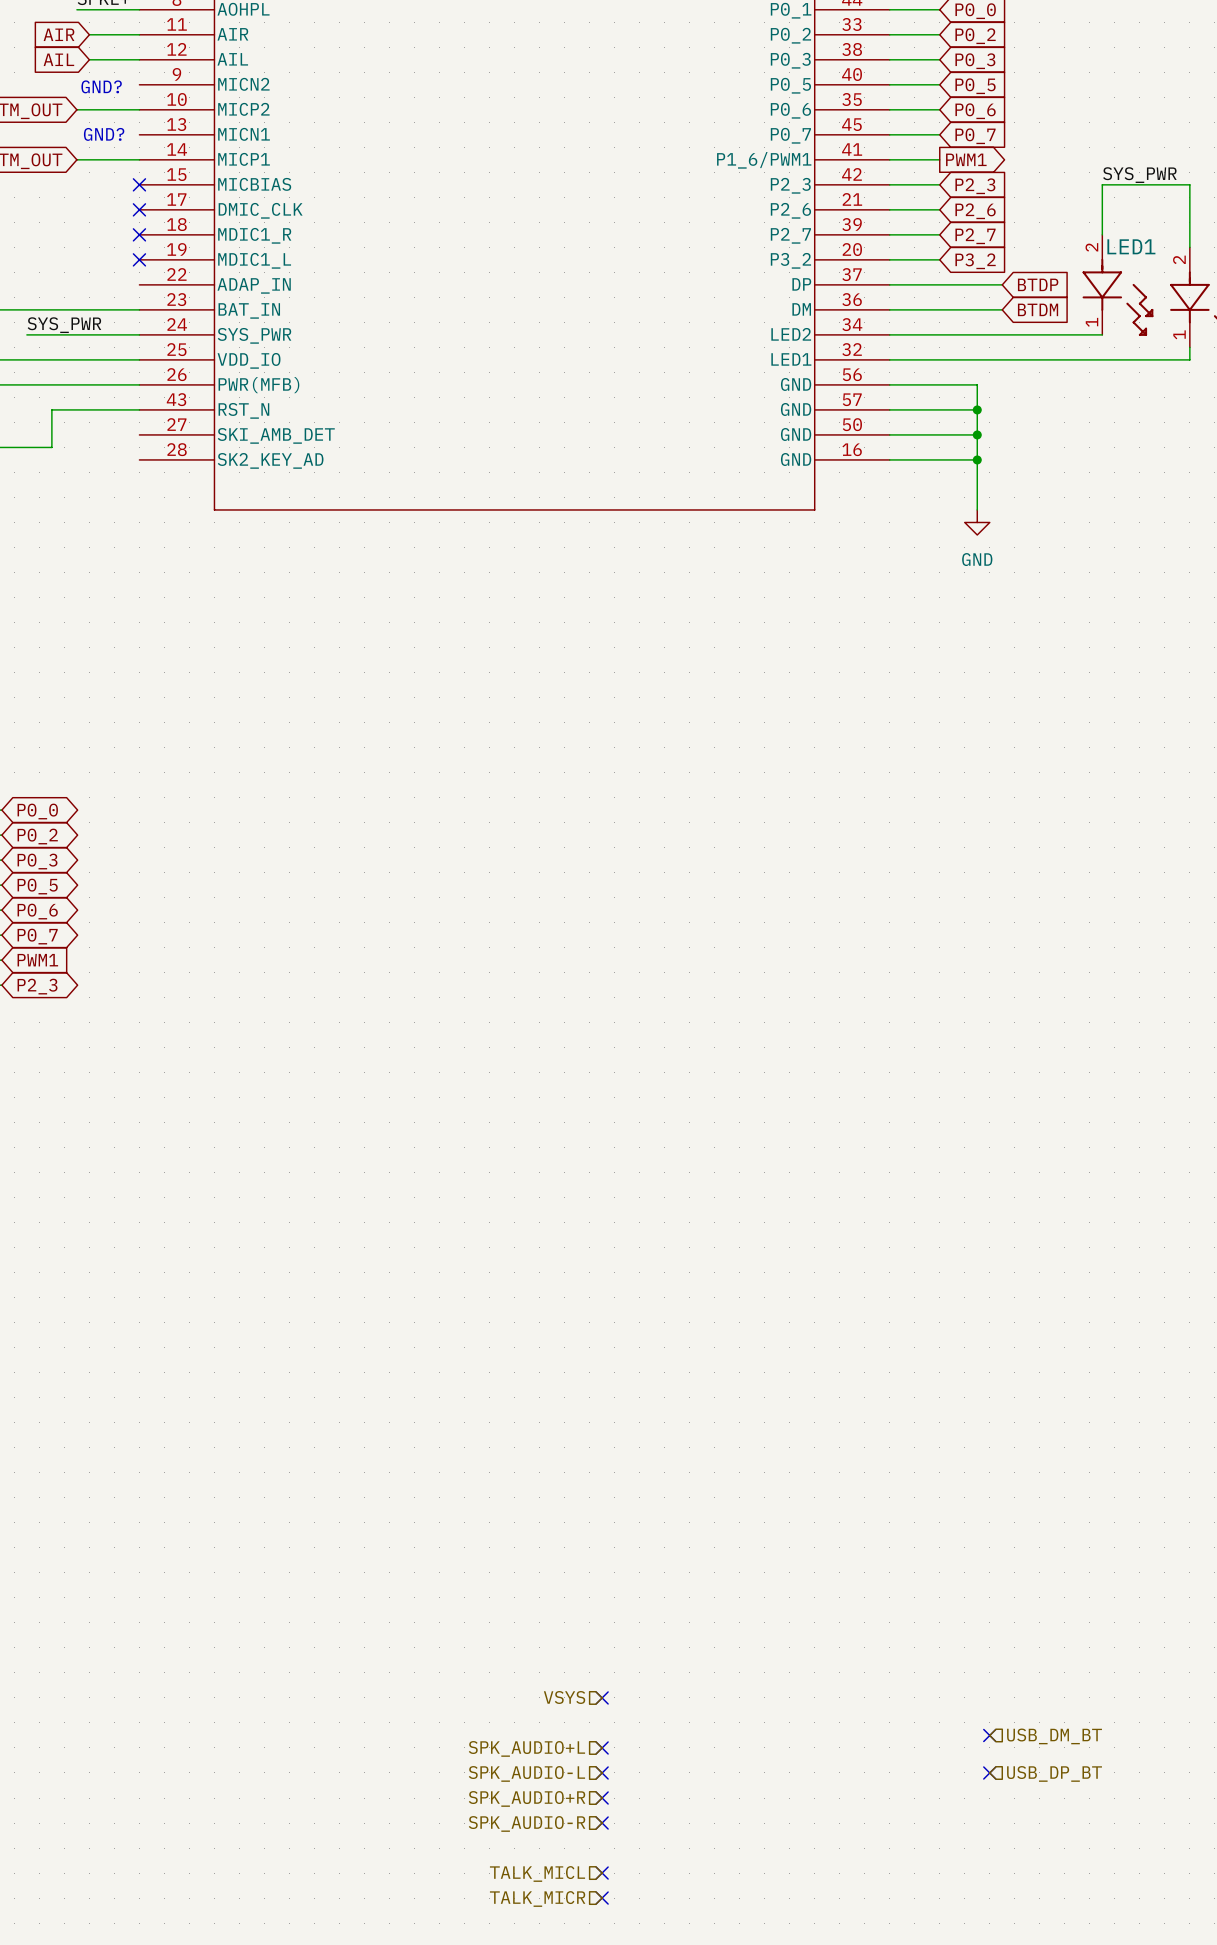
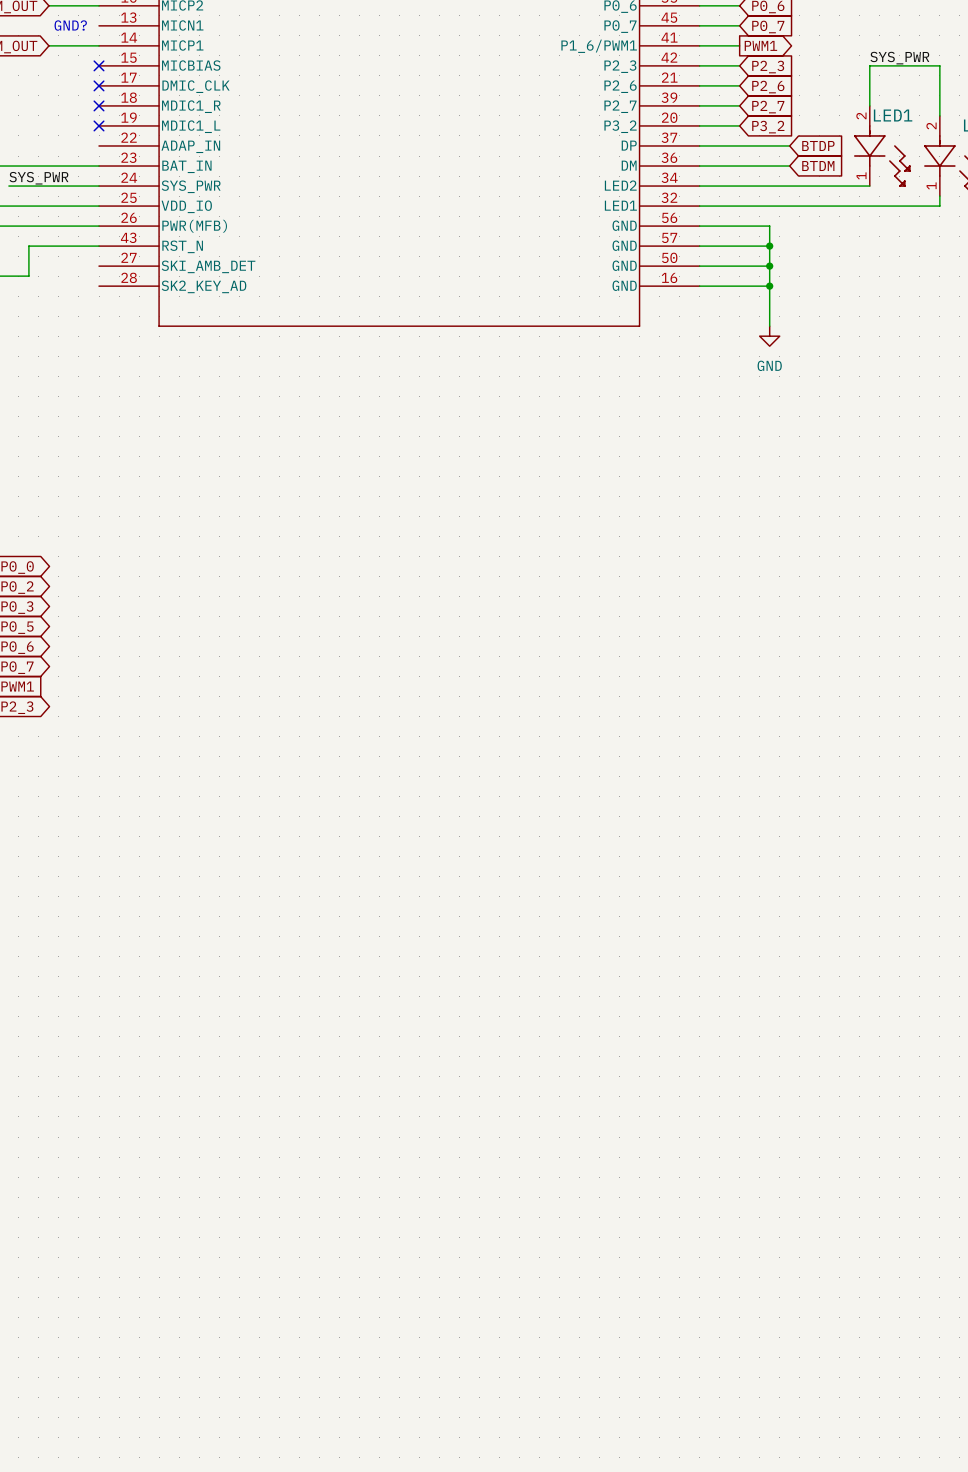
hierarchical label: VSYS (564, 1697) -> none
no-connect mark: (602, 1697) -> none
no-connect mark: (989, 1735) -> none
hierarchical label: USB_DM_BT (1054, 1736) -> none
no-connect mark: (602, 1747) -> none
hierarchical label: SPK_AUDIO+L (526, 1748) -> none
no-connect mark: (602, 1772) -> none
no-connect mark: (989, 1772) -> none
hierarchical label: SPK_AUDIO-L (526, 1773) -> none
hierarchical label: USB_DP_BT (1054, 1773) -> none
hierarchical label: SPK_AUDIO+R (527, 1798) -> none
no-connect mark: (602, 1798) -> none
hierarchical label: SPK_AUDIO-R (527, 1823) -> none
no-connect mark: (602, 1823) -> none
hierarchical label: TALK_MICL (537, 1873) -> none
no-connect mark: (602, 1873) -> none
hierarchical label: TALK_MICR (537, 1898) -> none
no-connect mark: (602, 1898) -> none

